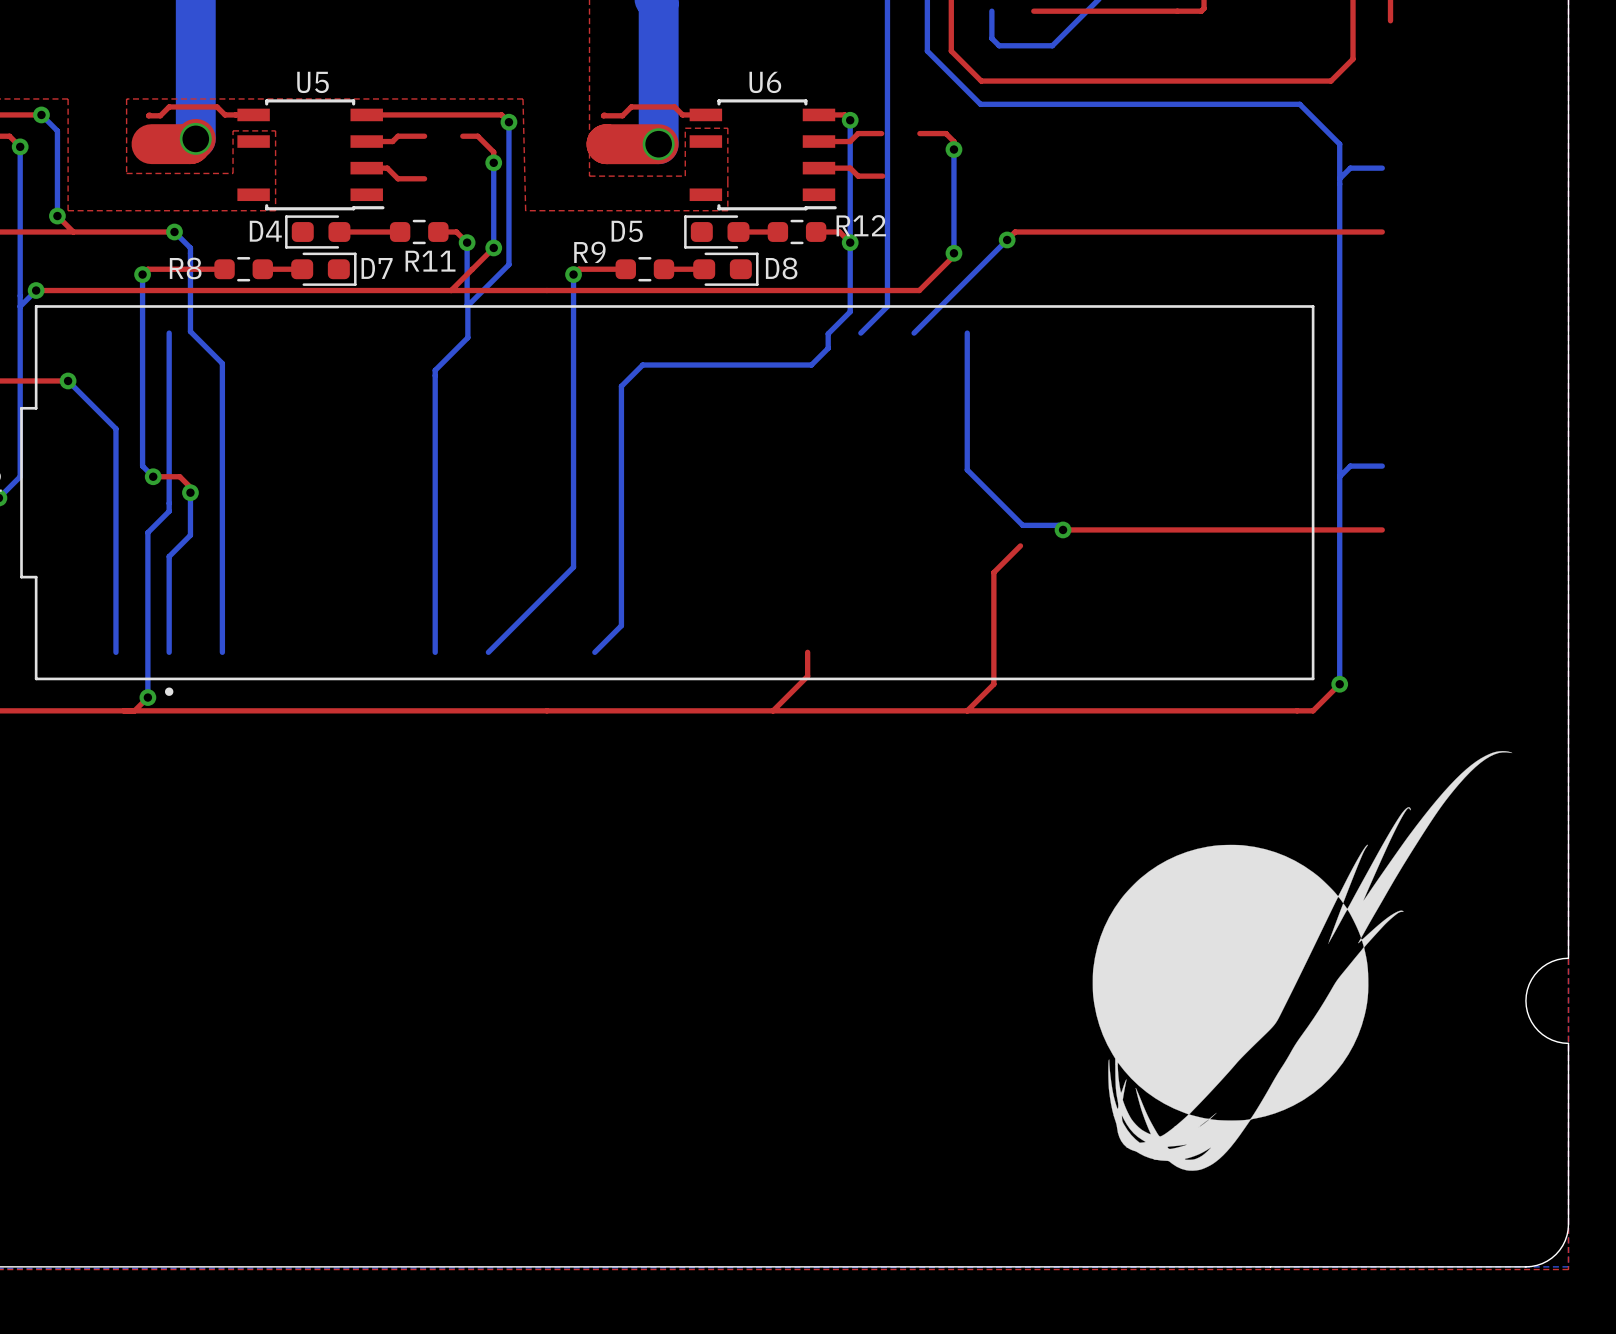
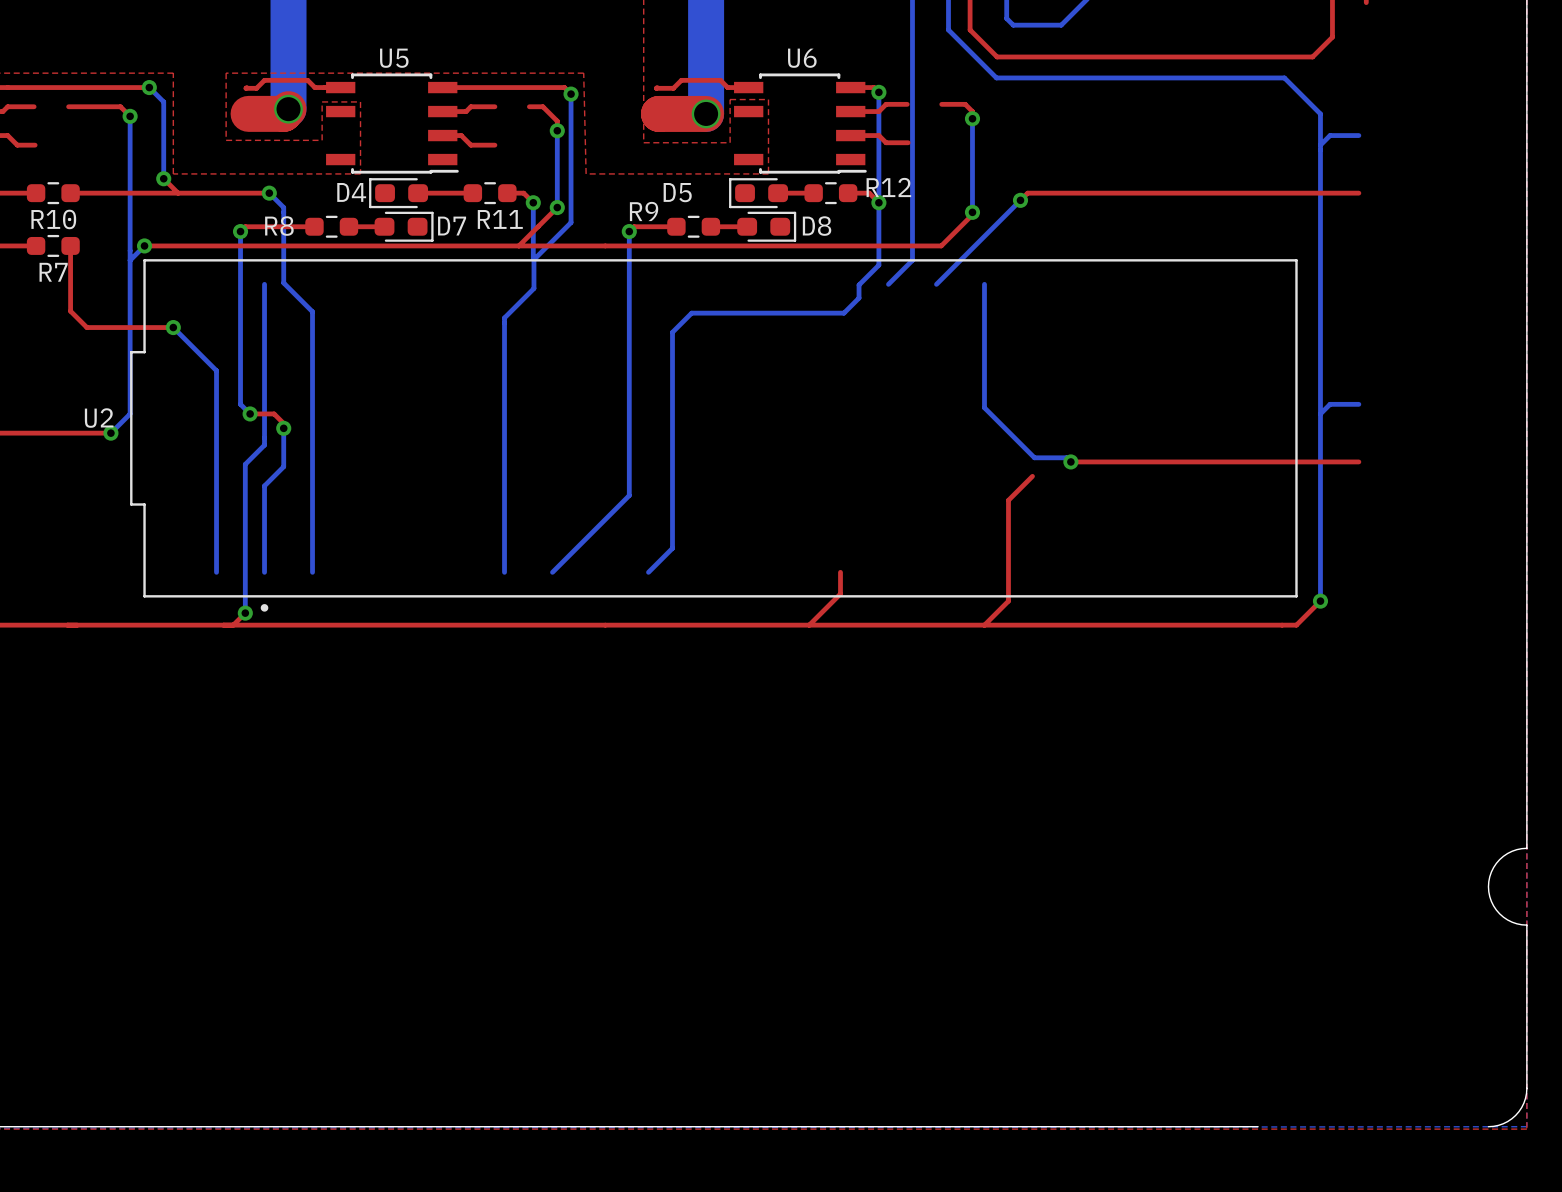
drawing: [1092, 751, 1513, 1171] -> none
board edge: (1270, 1266) (1525, 1266) -> none

